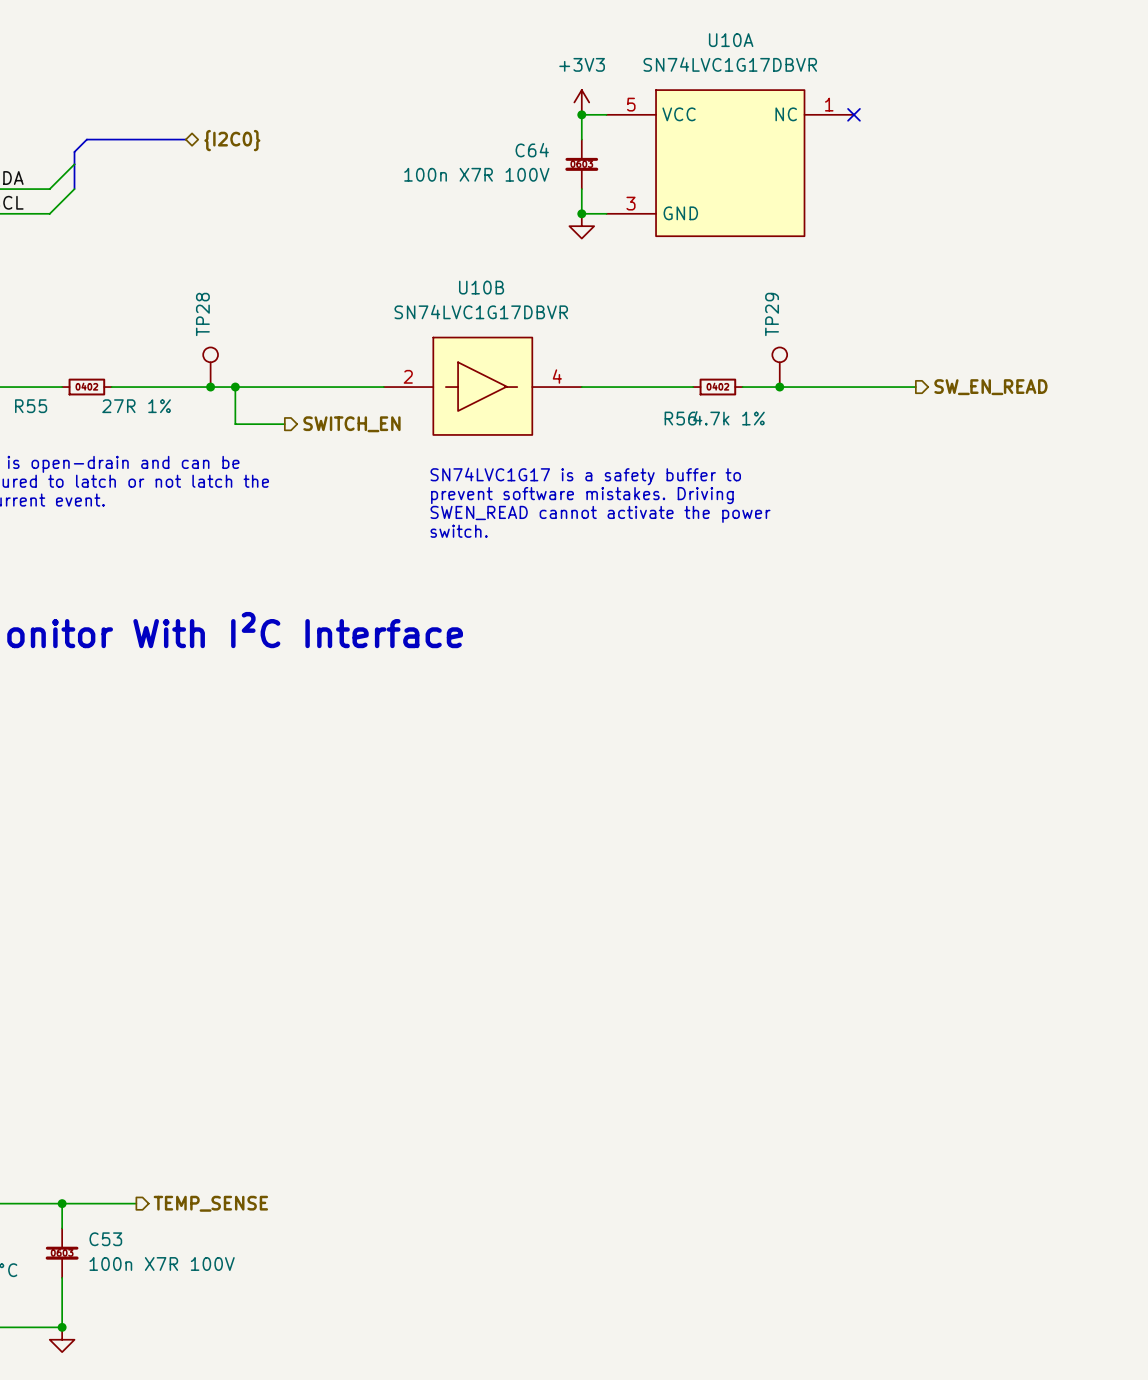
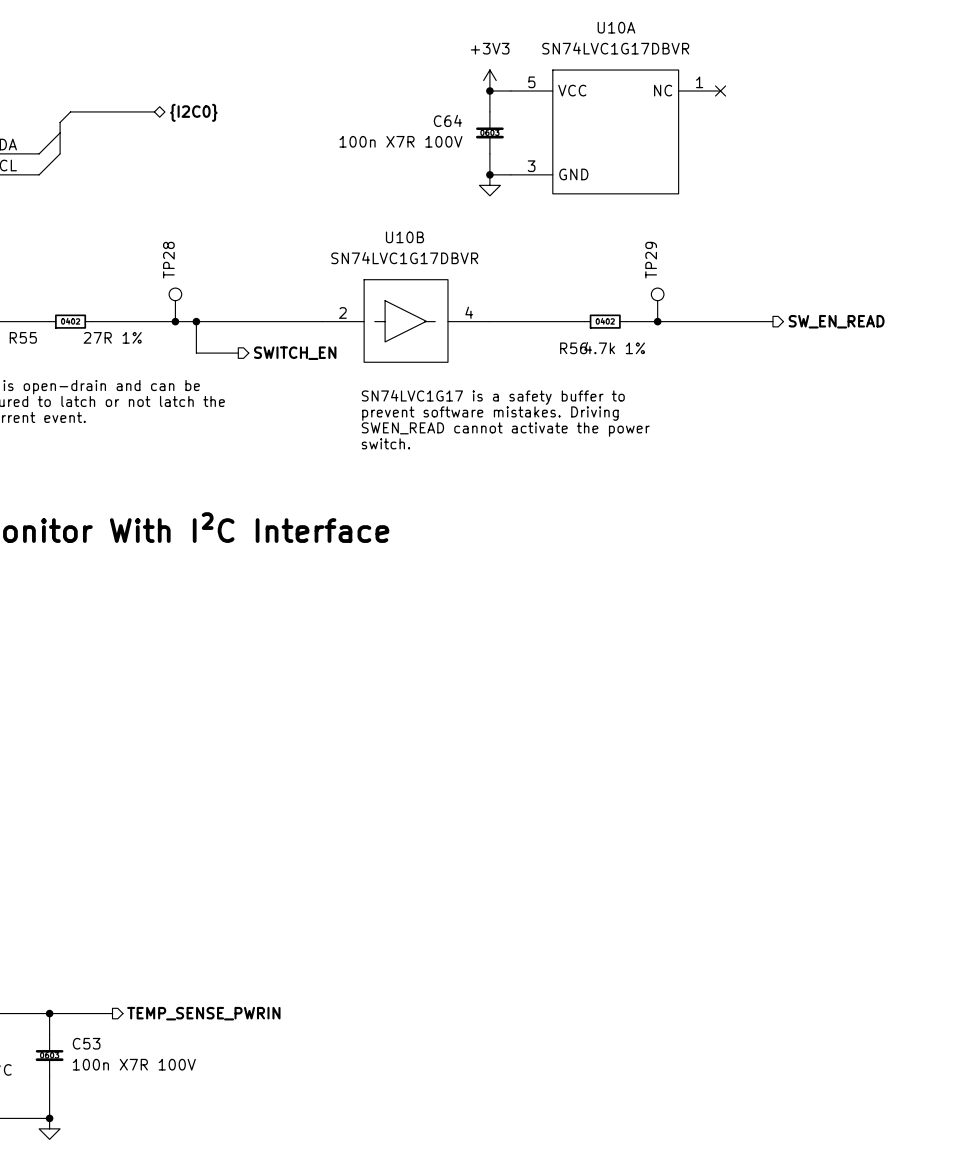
hierarchical label: TEMP_SENSE (210, 1203) -> TEMP_SENSE_PWRIN (203, 1013)

